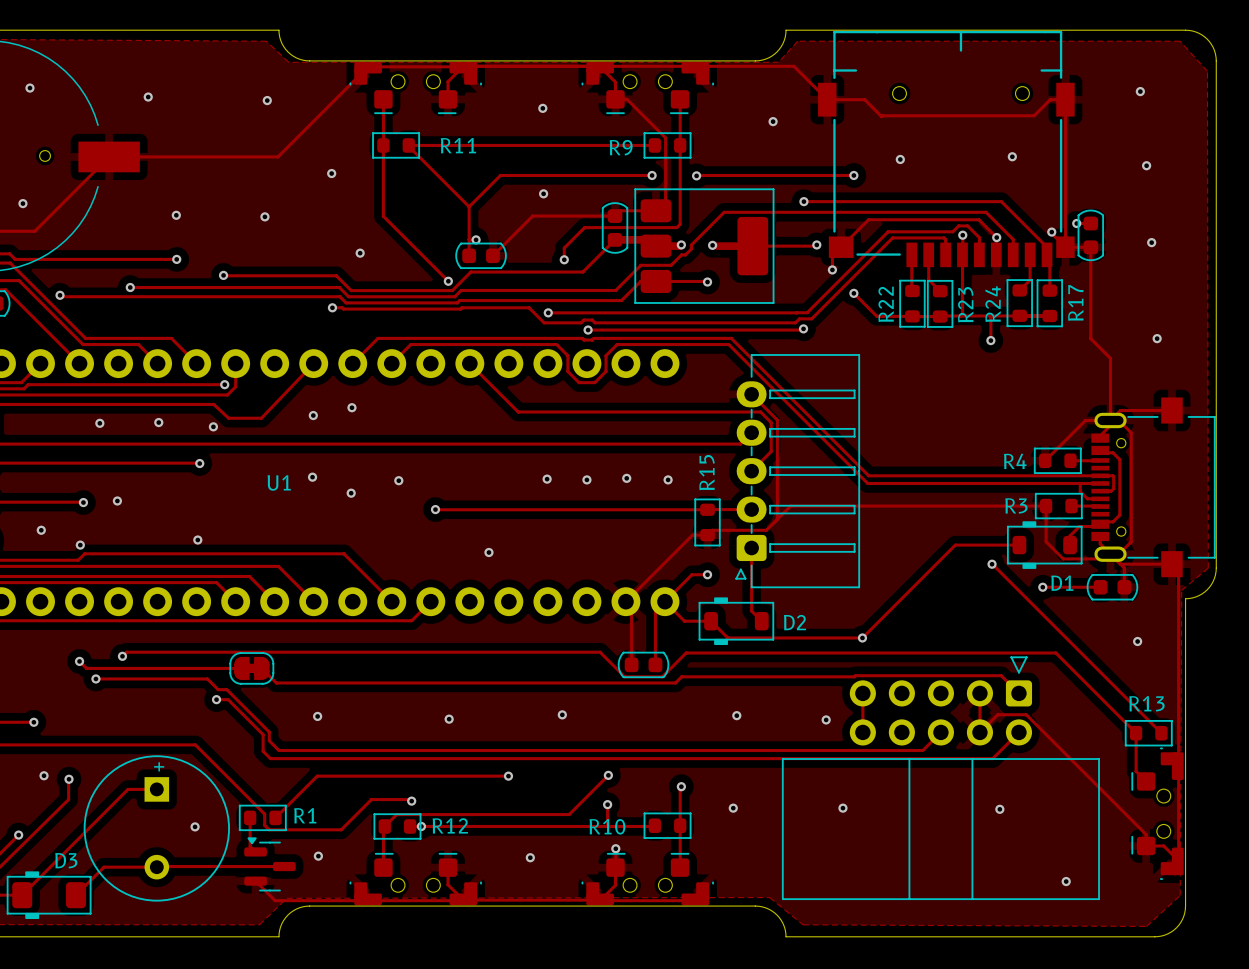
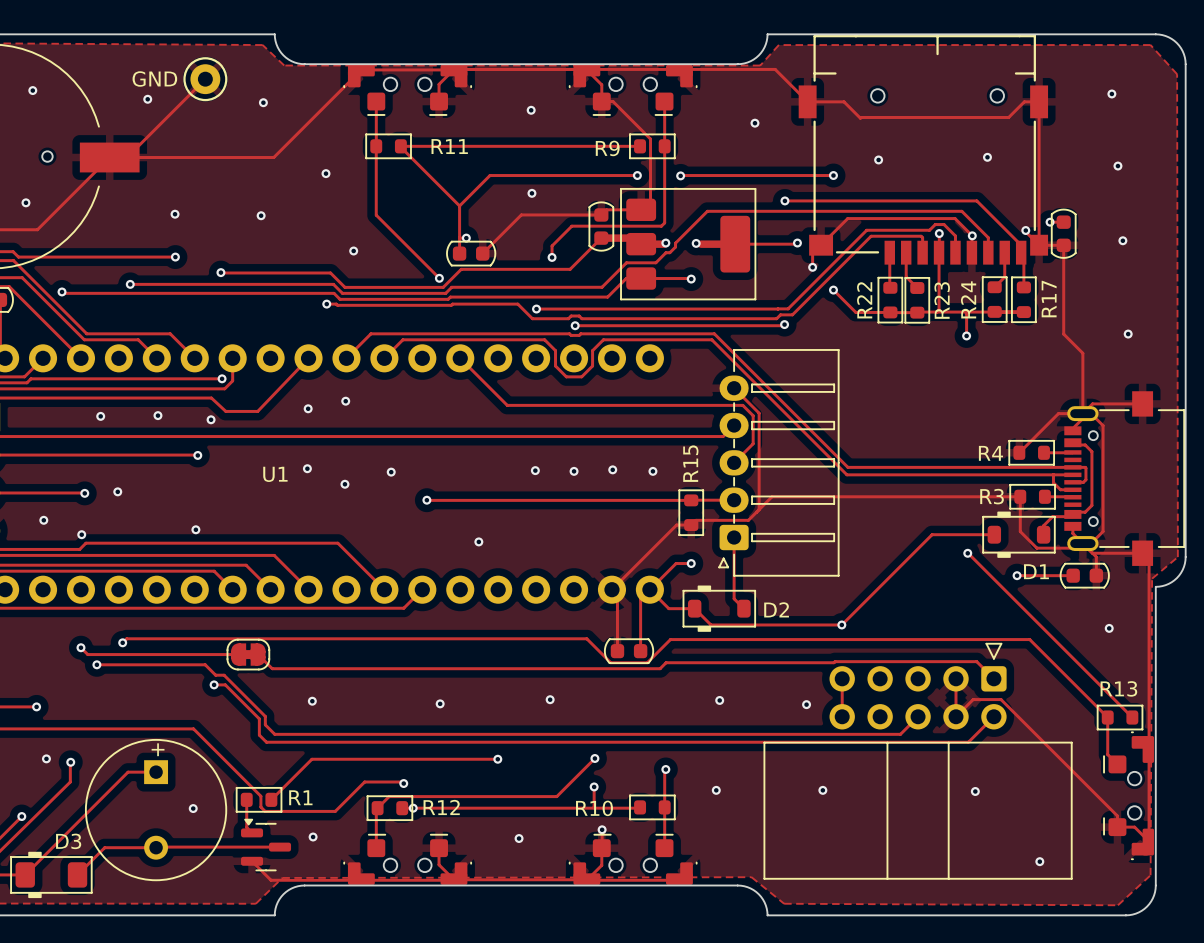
text: none -> GND (154, 79)
track: none -> (205, 79) (127, 157)
part: none -> (205, 79)

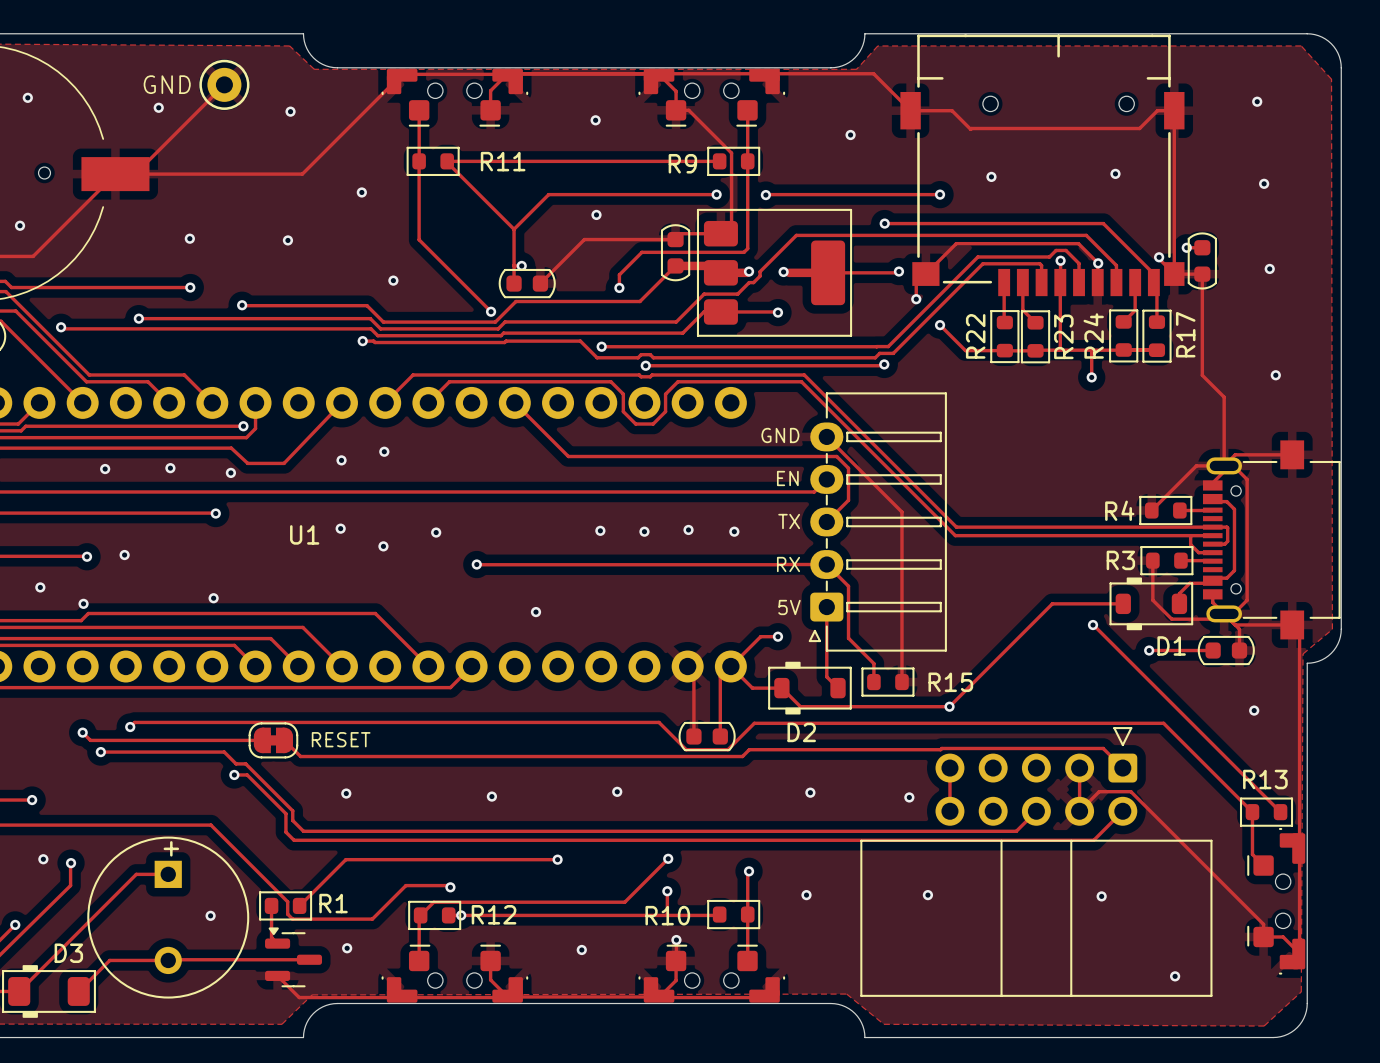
text: none -> GND (780, 435)
track: (759, 413) (759, 509) -> (855, 465) (901, 512) (901, 682)
text: none -> EN (787, 478)
text: none -> TX (789, 521)
track: (1020, 496) (772, 496) (748, 520) (695, 520) (691, 525) (676, 525) (611, 589) -> none
text: none -> RX (788, 564)
track: none -> (826, 564) (848, 586) (848, 638) (873, 663) (873, 682)
R15 rotation: 0° (691, 512) -> 90° clockwise (887, 682)
R15 position: (691, 512) -> (887, 682)
text: none -> 5V (789, 607)
D2 name position: D2 (776, 609) -> D2 (801, 732)
text: none -> RESET (341, 739)

